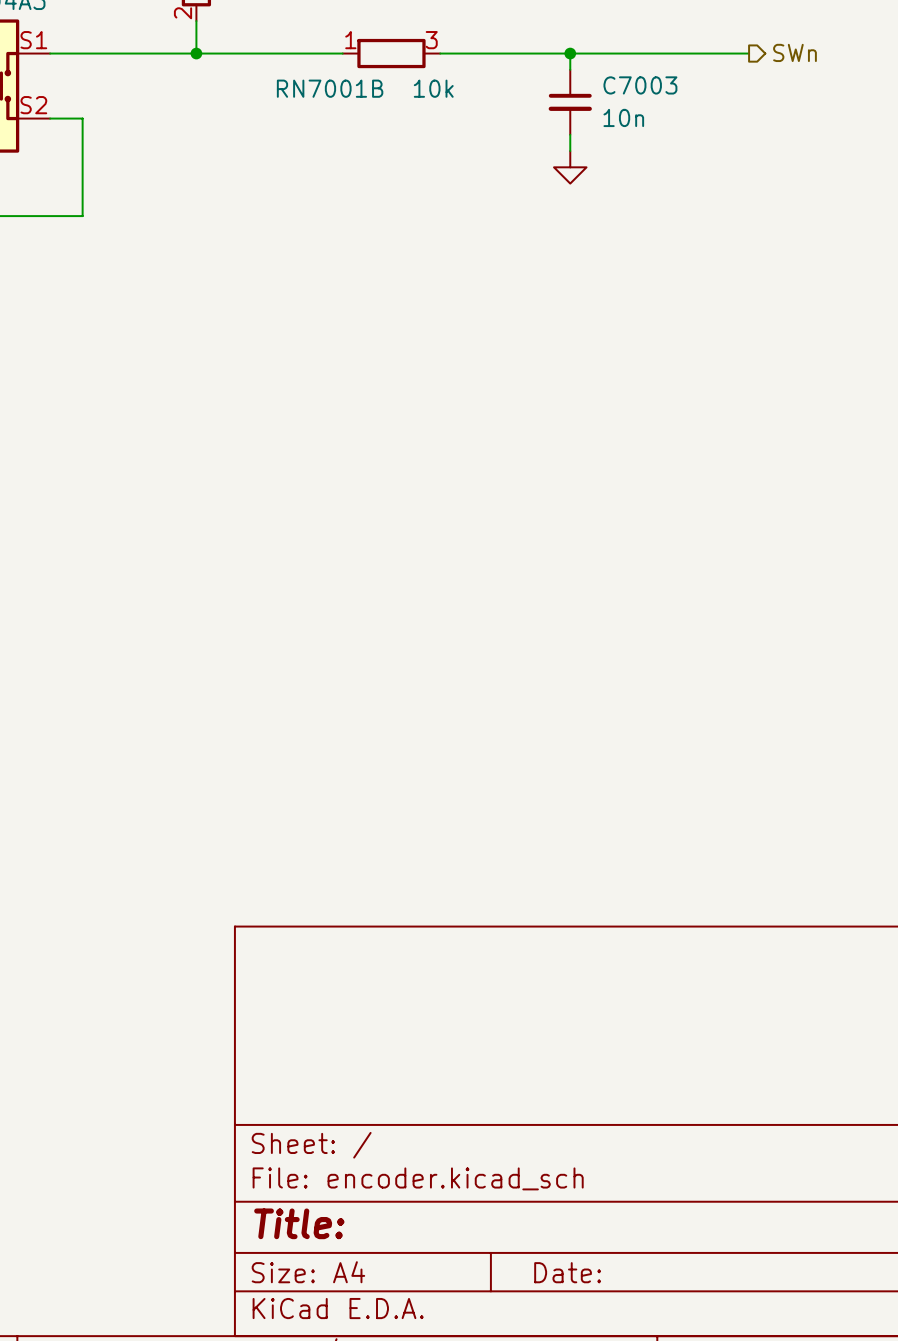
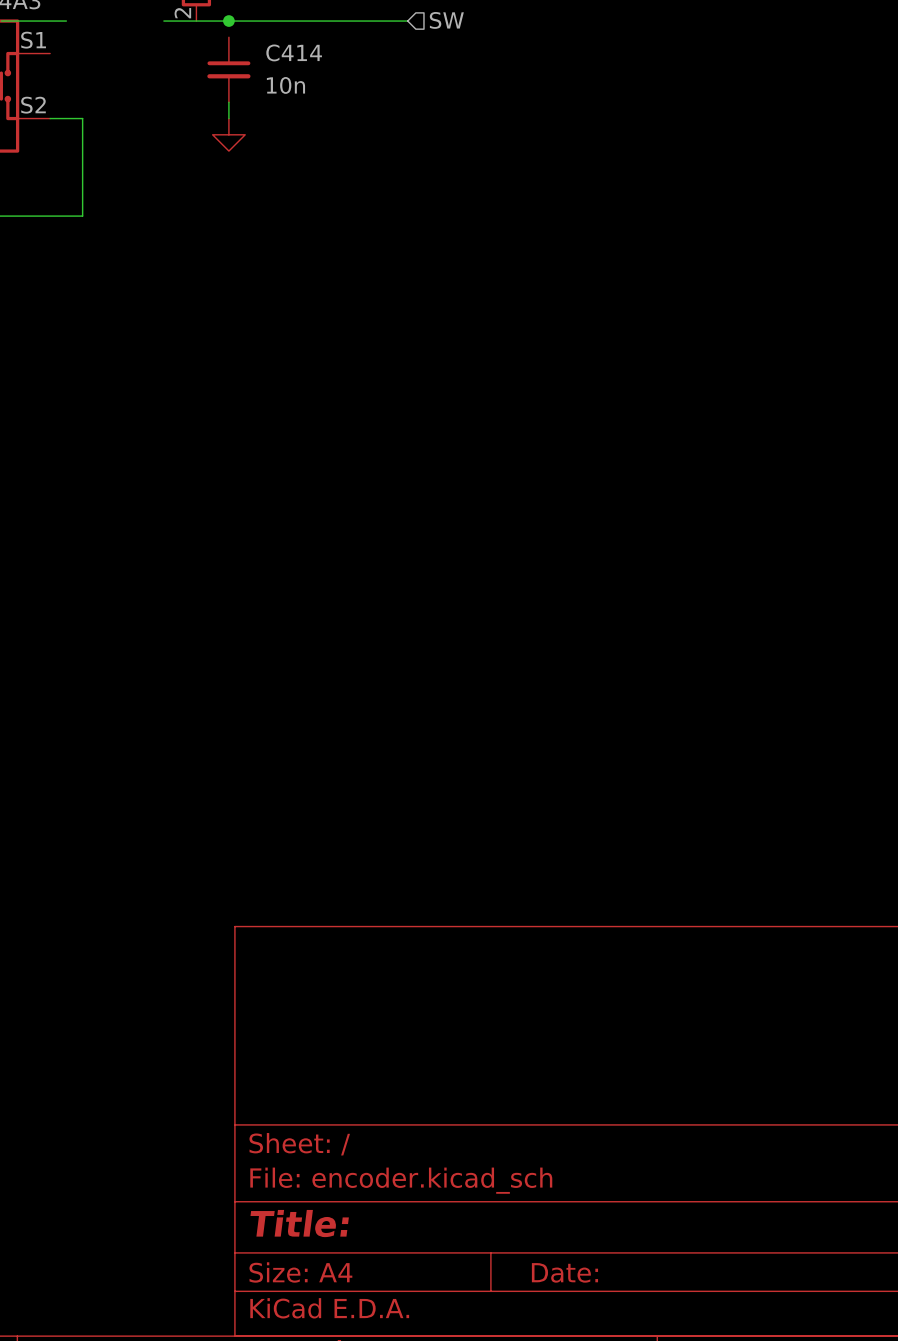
hierarchical label: none -> SW (446, 20)
wire: none -> (1, 21) (66, 21)
wire: none -> (163, 21) (407, 21)
wire: (196, 21) (196, 53) -> none
hierarchical label: SWn (794, 52) -> none
wire: (50, 53) (342, 53) -> none
junction position: (196, 53) -> (228, 21)
RN7001B: 10k (391, 53) -> none
wire: (440, 53) (749, 53) -> none
wire: (570, 53) (570, 69) -> none
junction: (570, 53) -> none
C414: none -> 10n (228, 69)
wire: none -> (228, 102) (228, 118)
C7003: 10n (570, 102) -> none
power symbol: none -> (228, 134)
wire: (570, 134) (570, 151) -> none
power symbol: (570, 167) -> none

